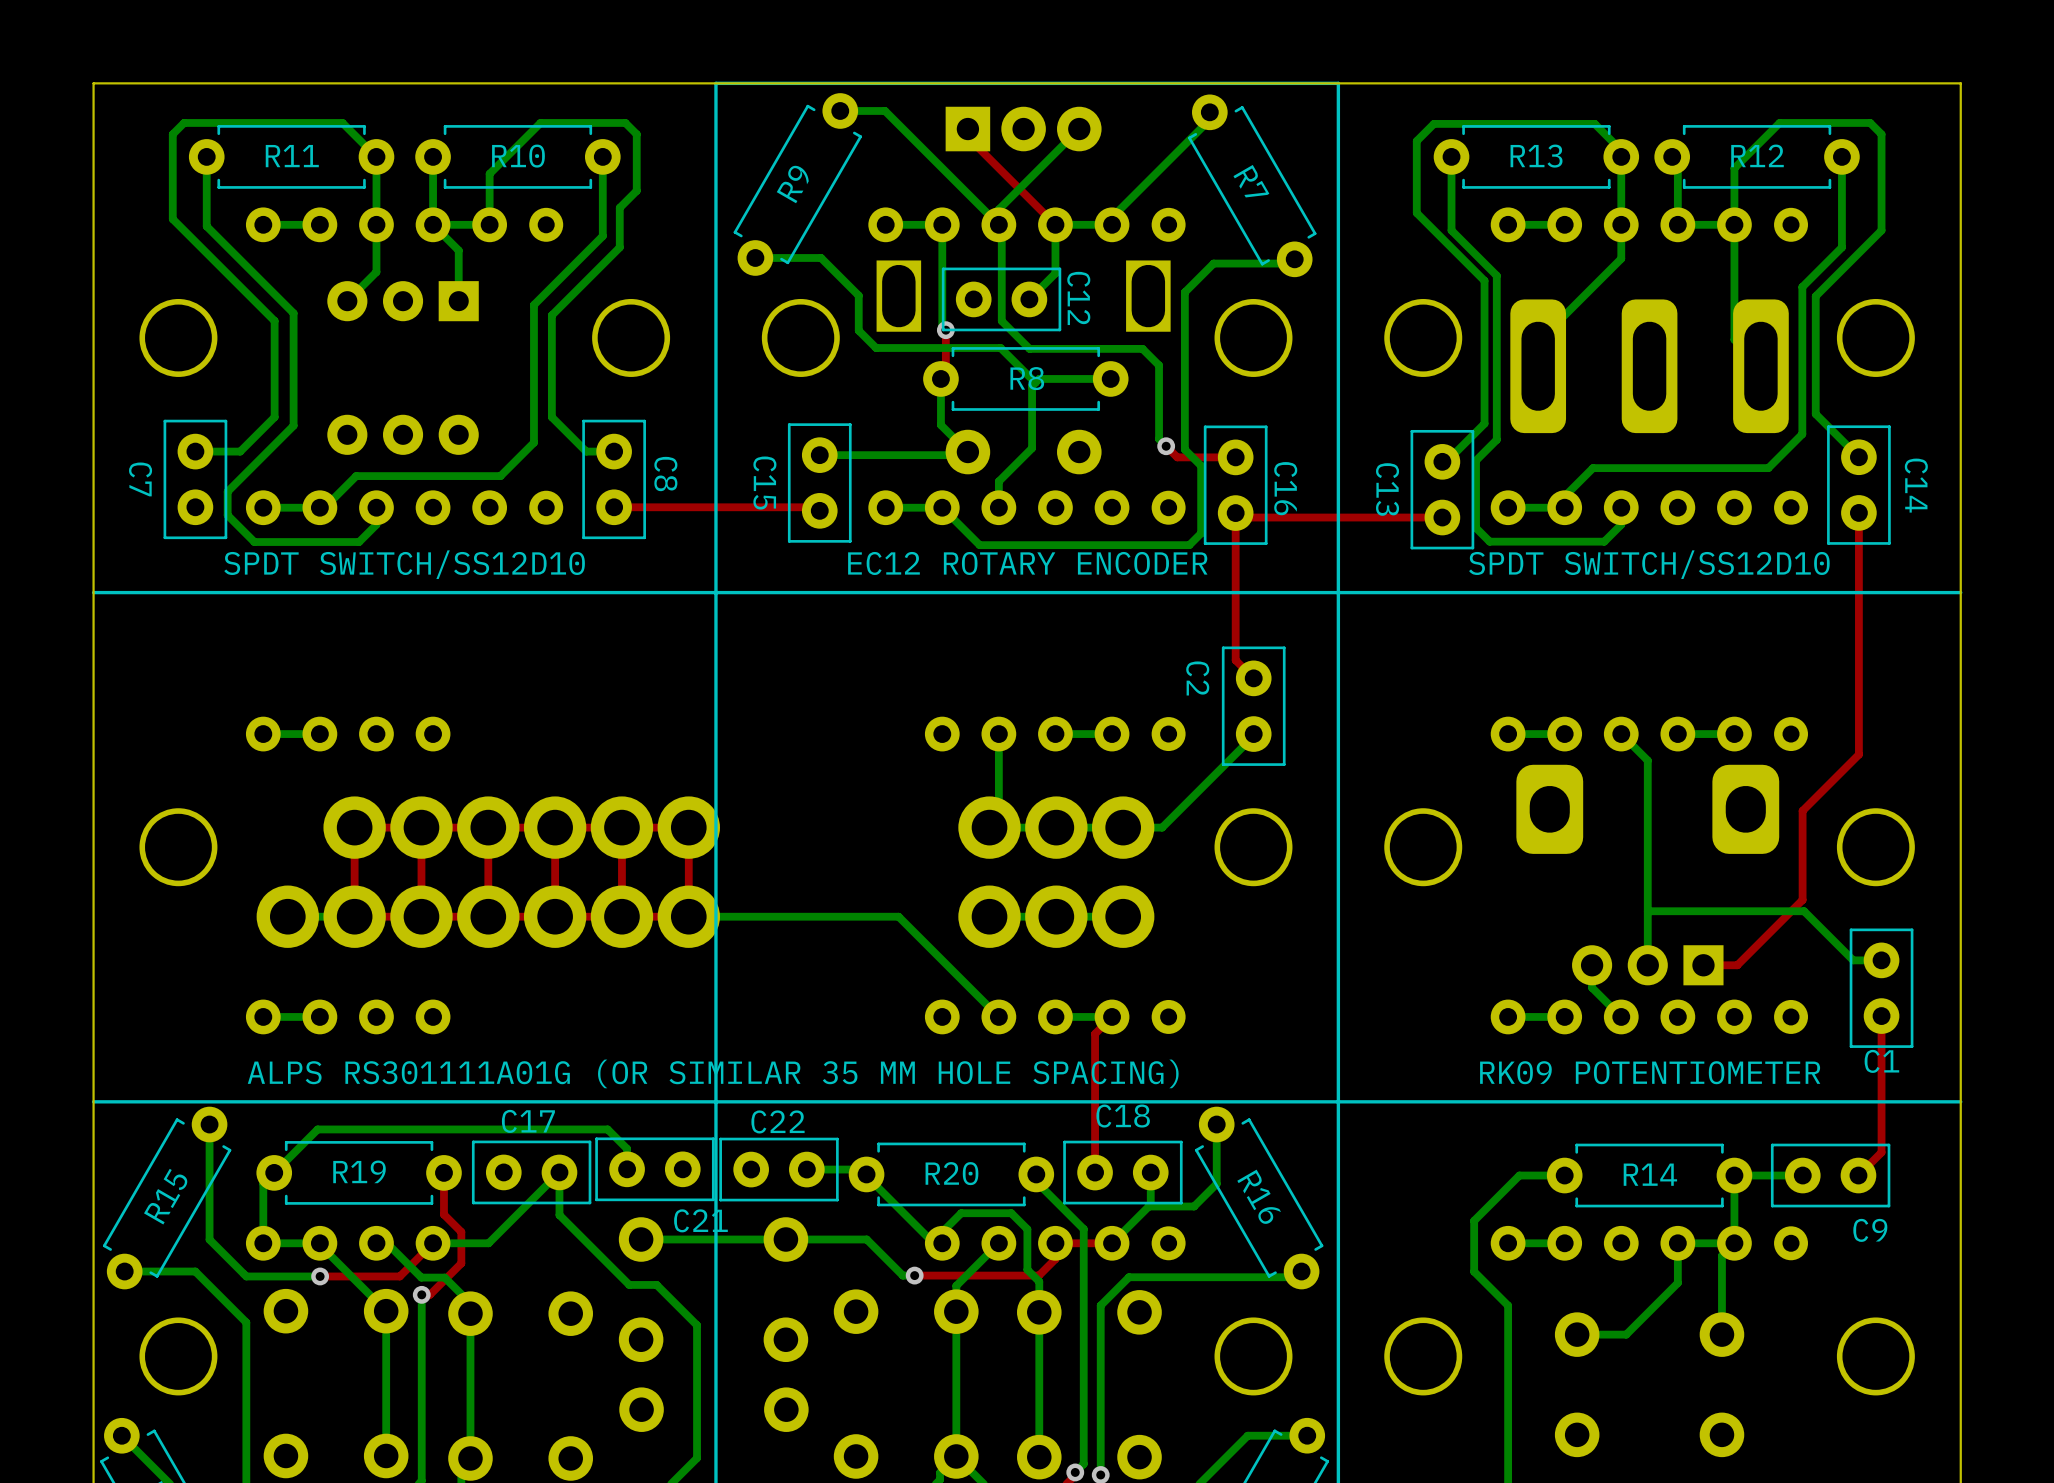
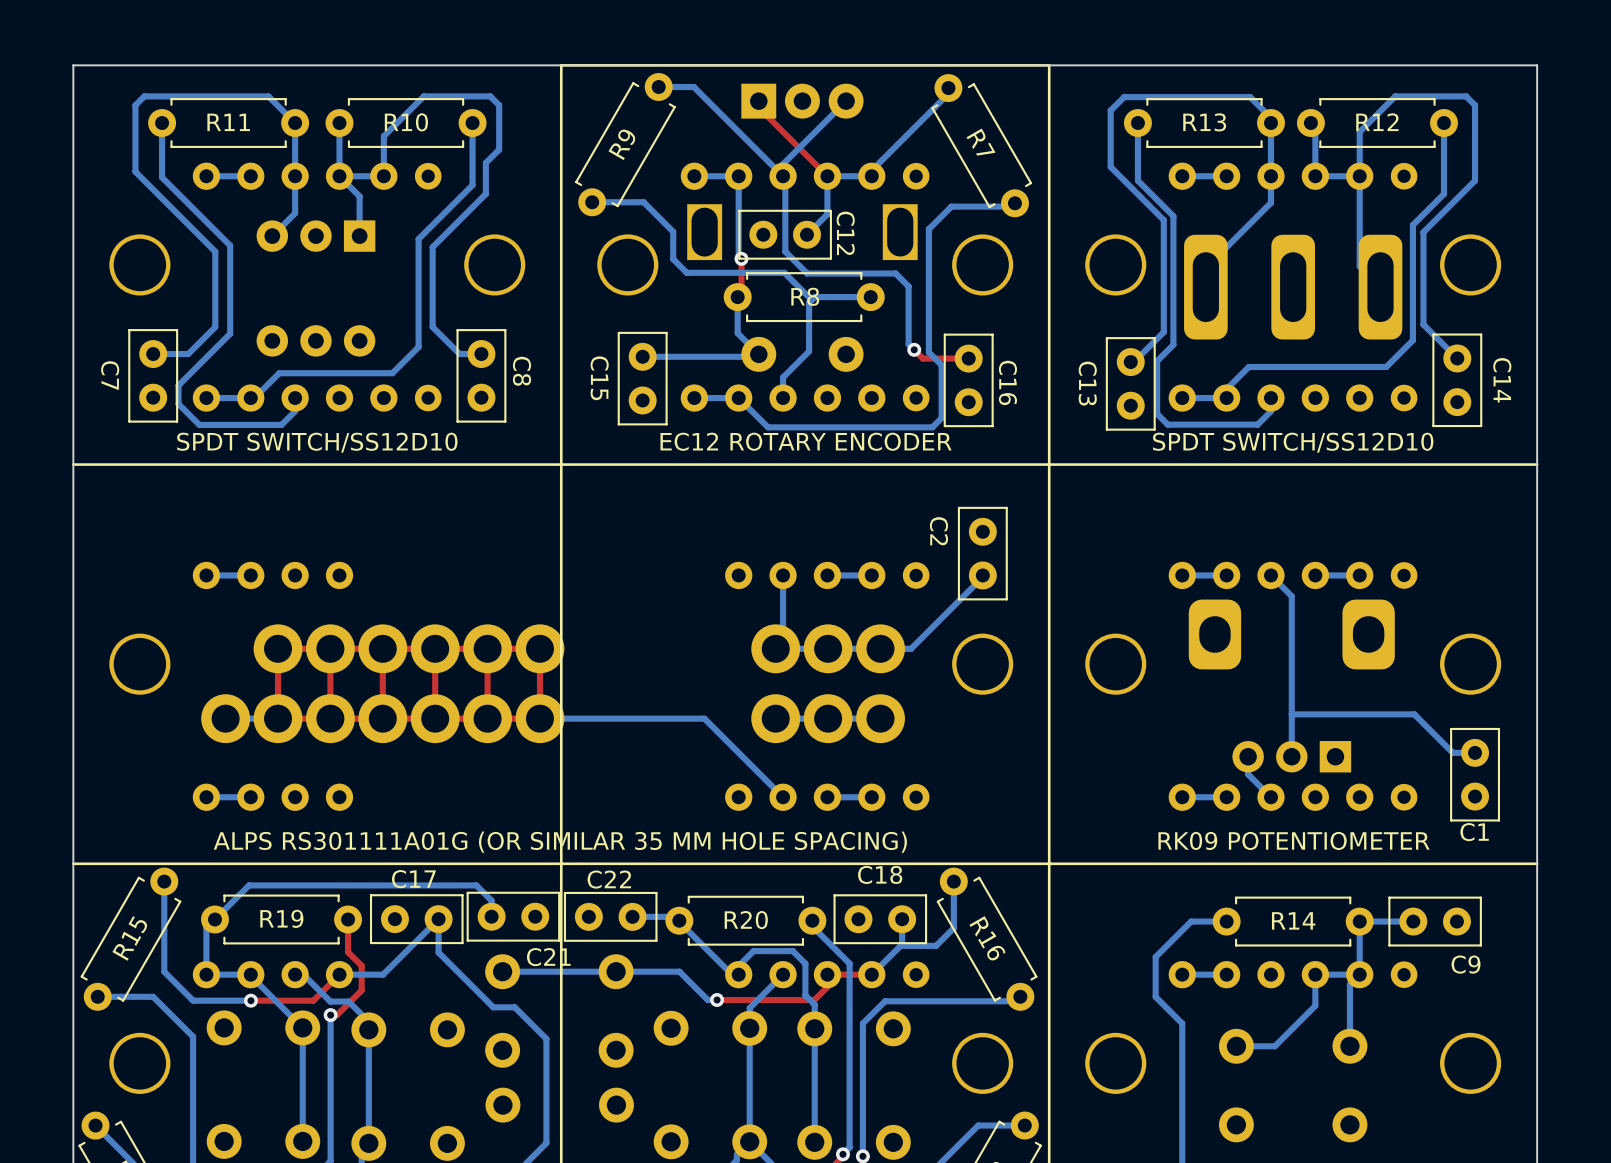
top track: (614, 507) (816, 507) (819, 510) -> none
top track: (1858, 512) (1858, 754) (1802, 810) (1802, 900) (1737, 965) (1703, 965) -> none
top track: (1442, 517) (1240, 517) (1235, 513) (1235, 660) (1253, 678) -> none
top track: (1112, 1016) (1095, 1033) (1095, 1172) -> none
top track: (1881, 1016) (1881, 1152) (1858, 1175) -> none

